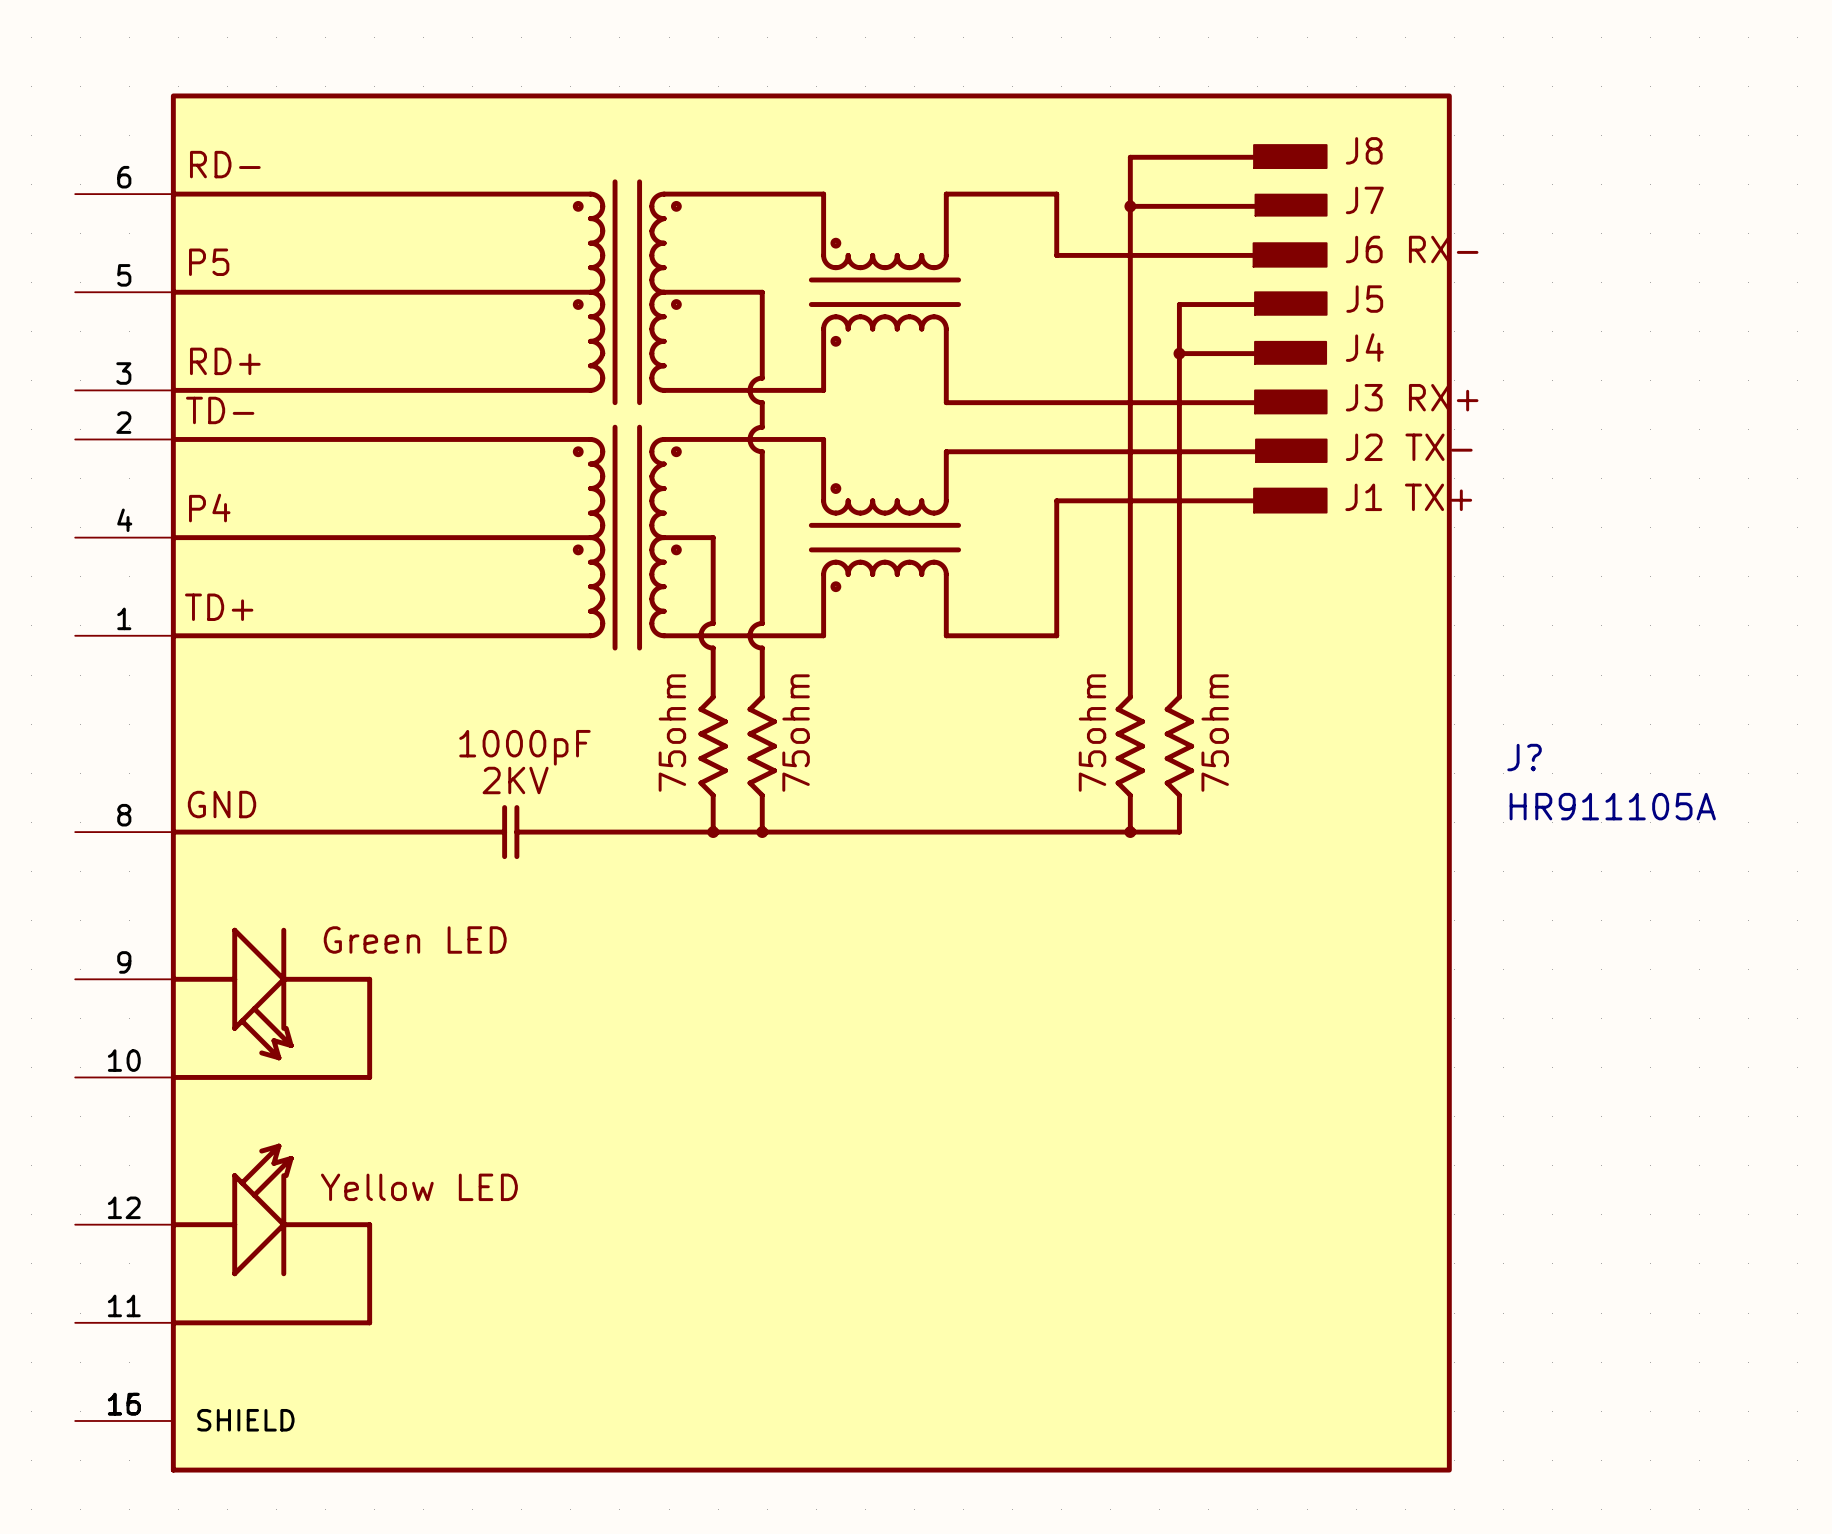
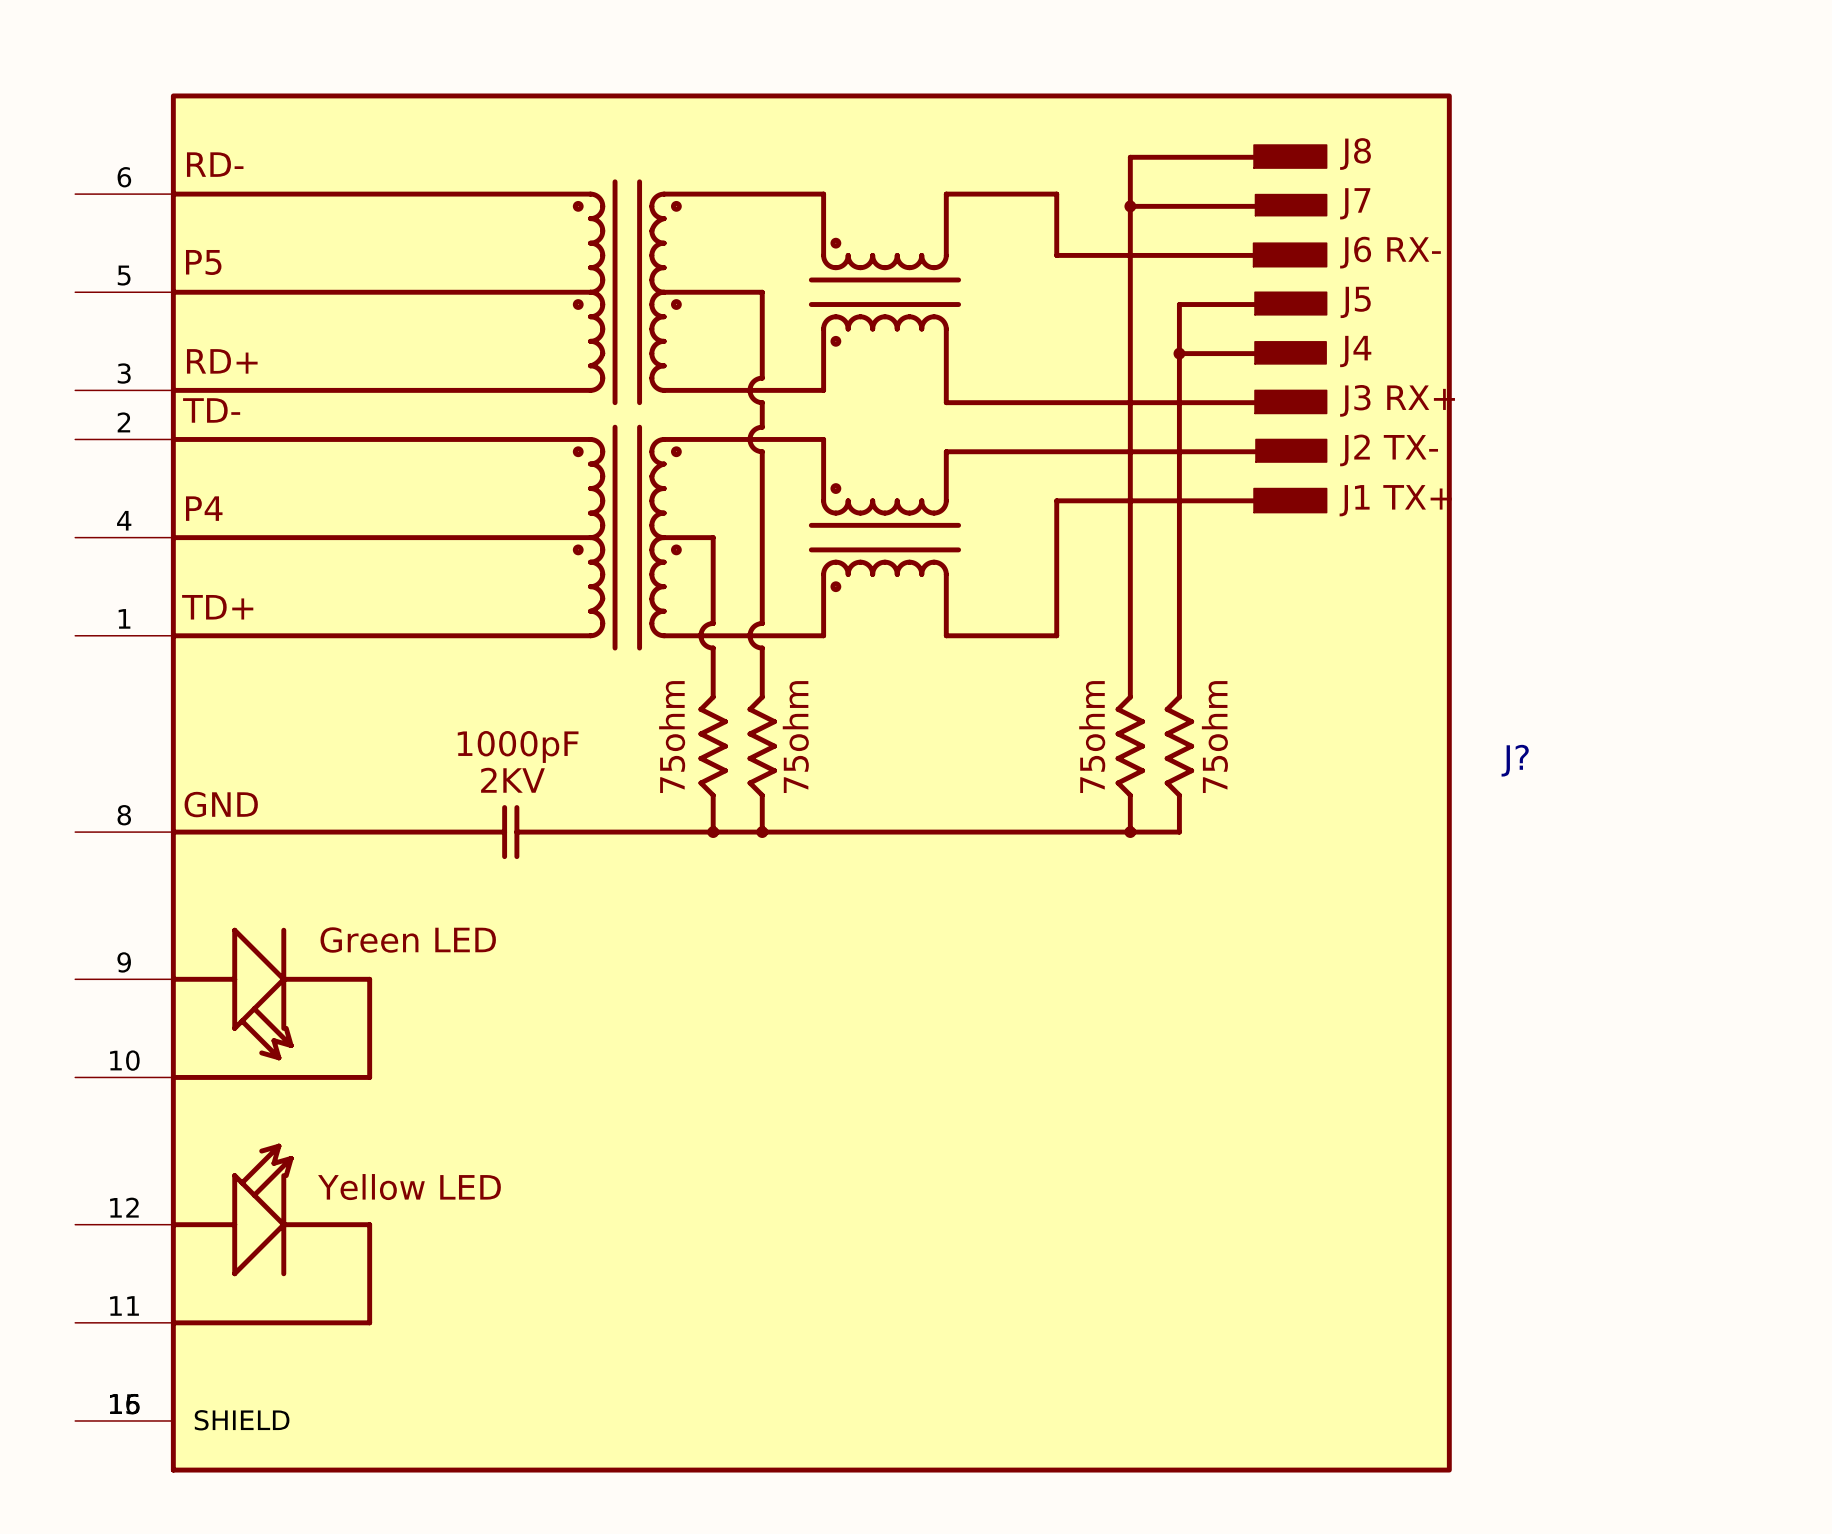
J? value: HR911105A (1612, 806) -> none

